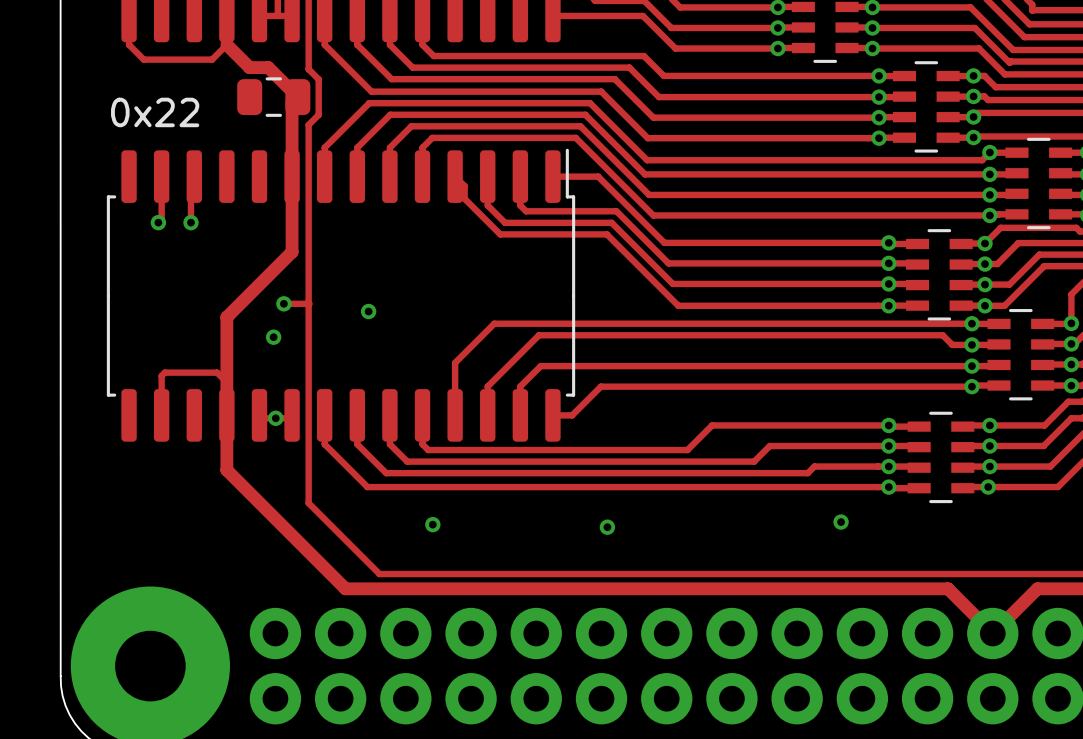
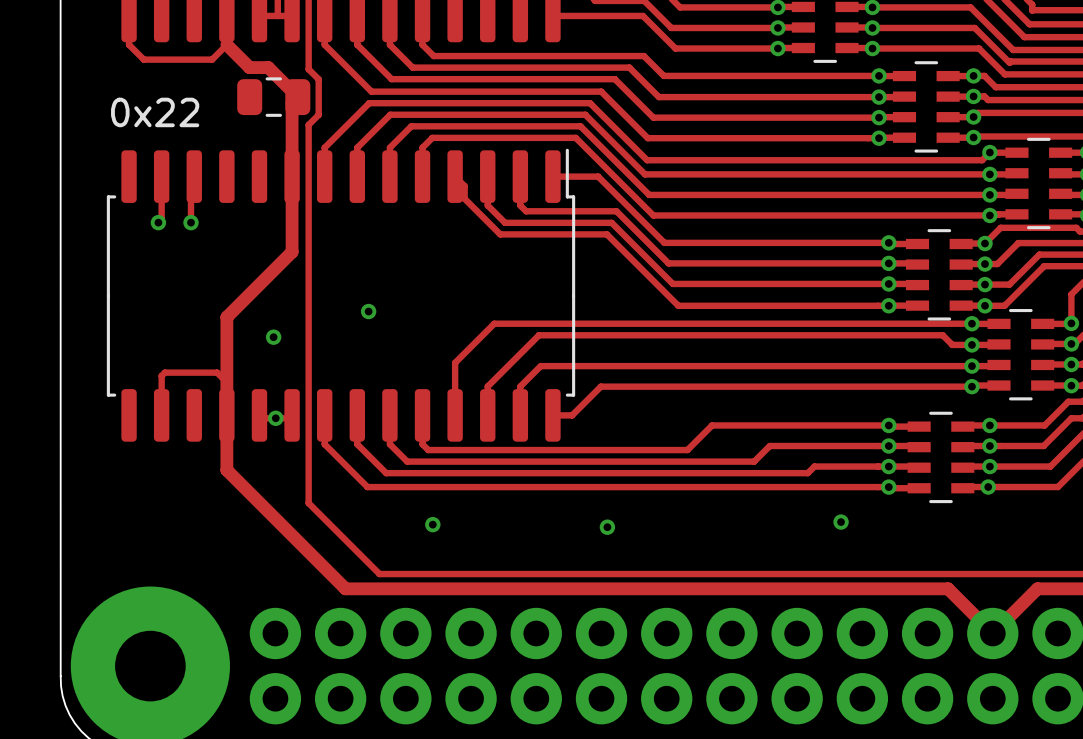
track: (283, 303) (309, 303) -> none
via: (283, 303) -> none

